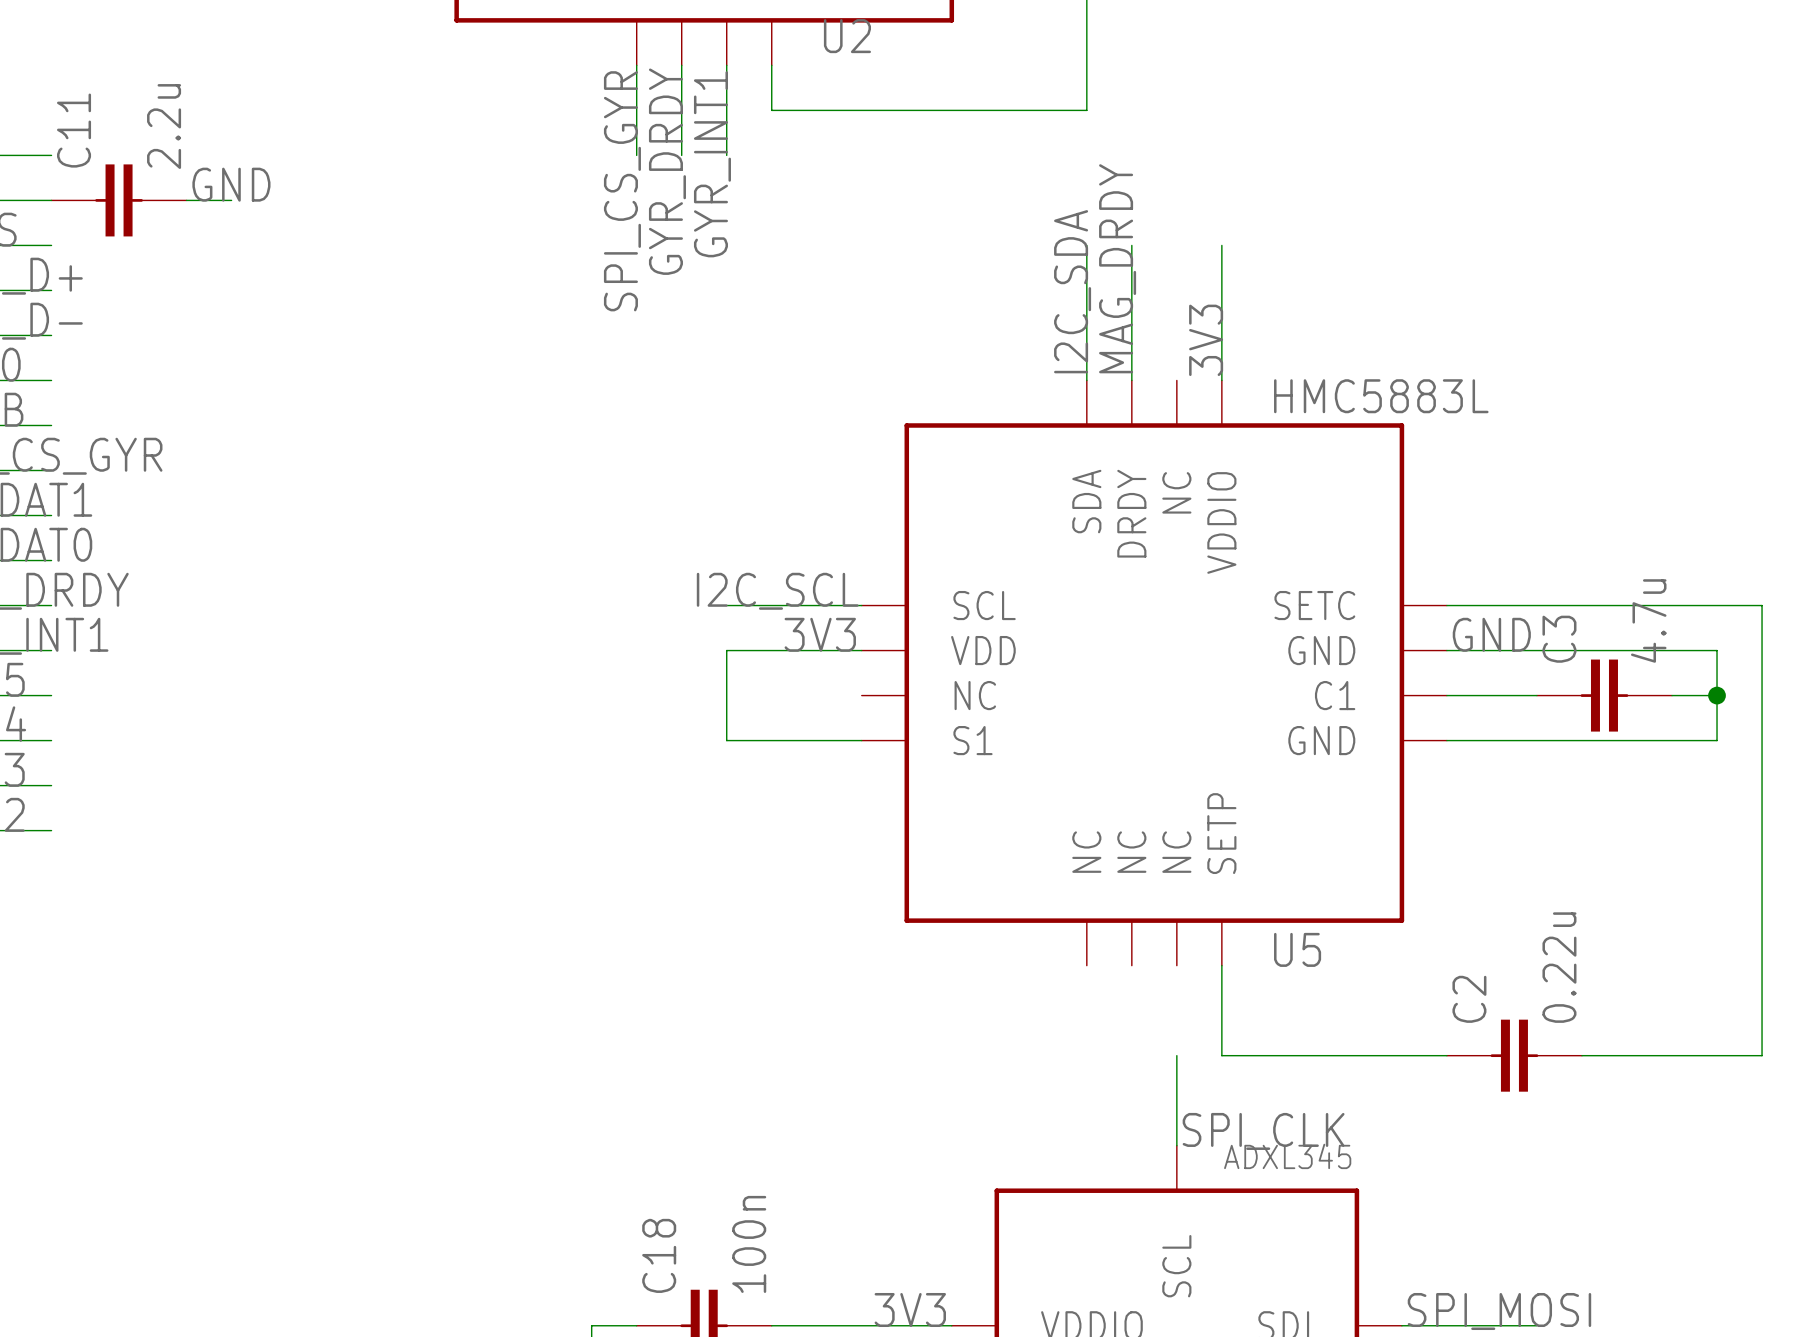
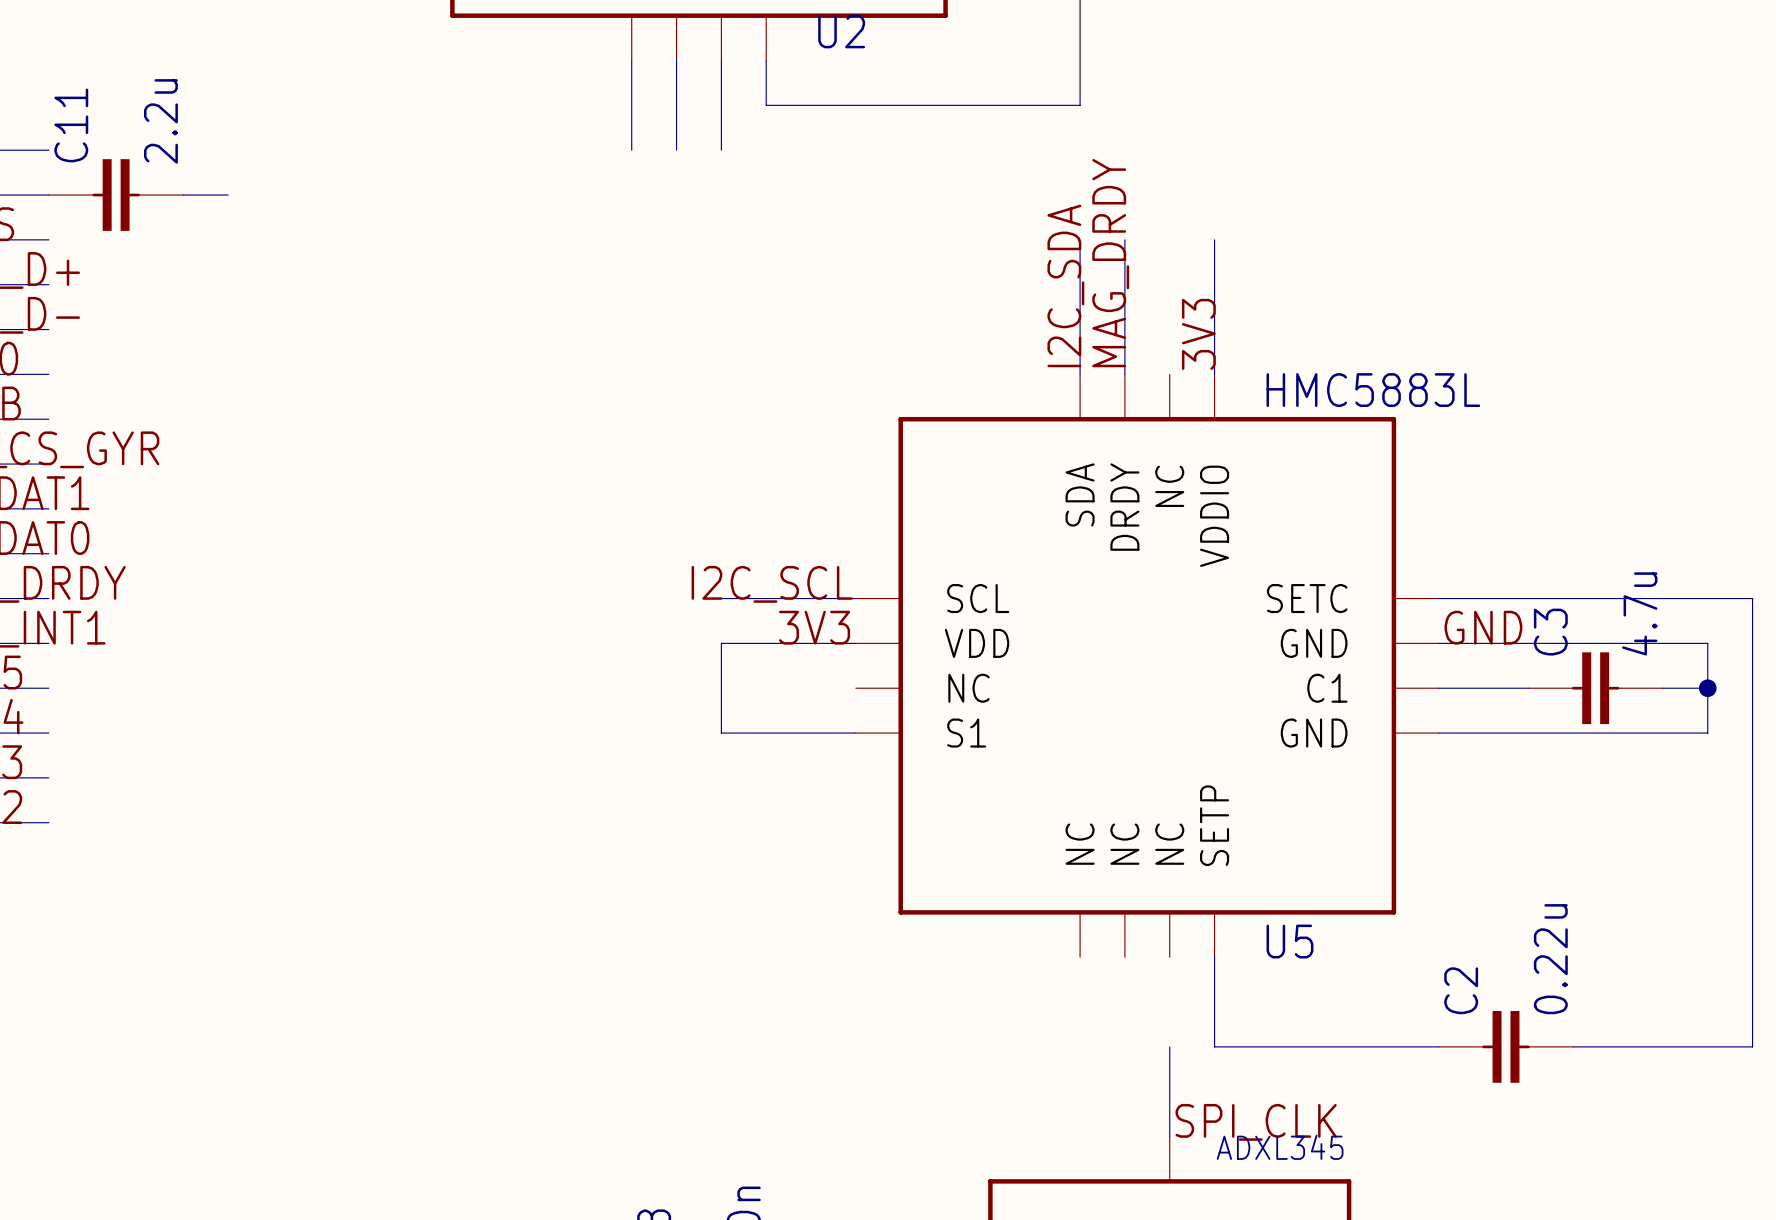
label: GYR_INT1 (712, 164) -> none
label: GYR_DRDY (667, 171) -> none
label: GND (231, 184) -> none
label: SPI_CS_GYR (622, 191) -> none

